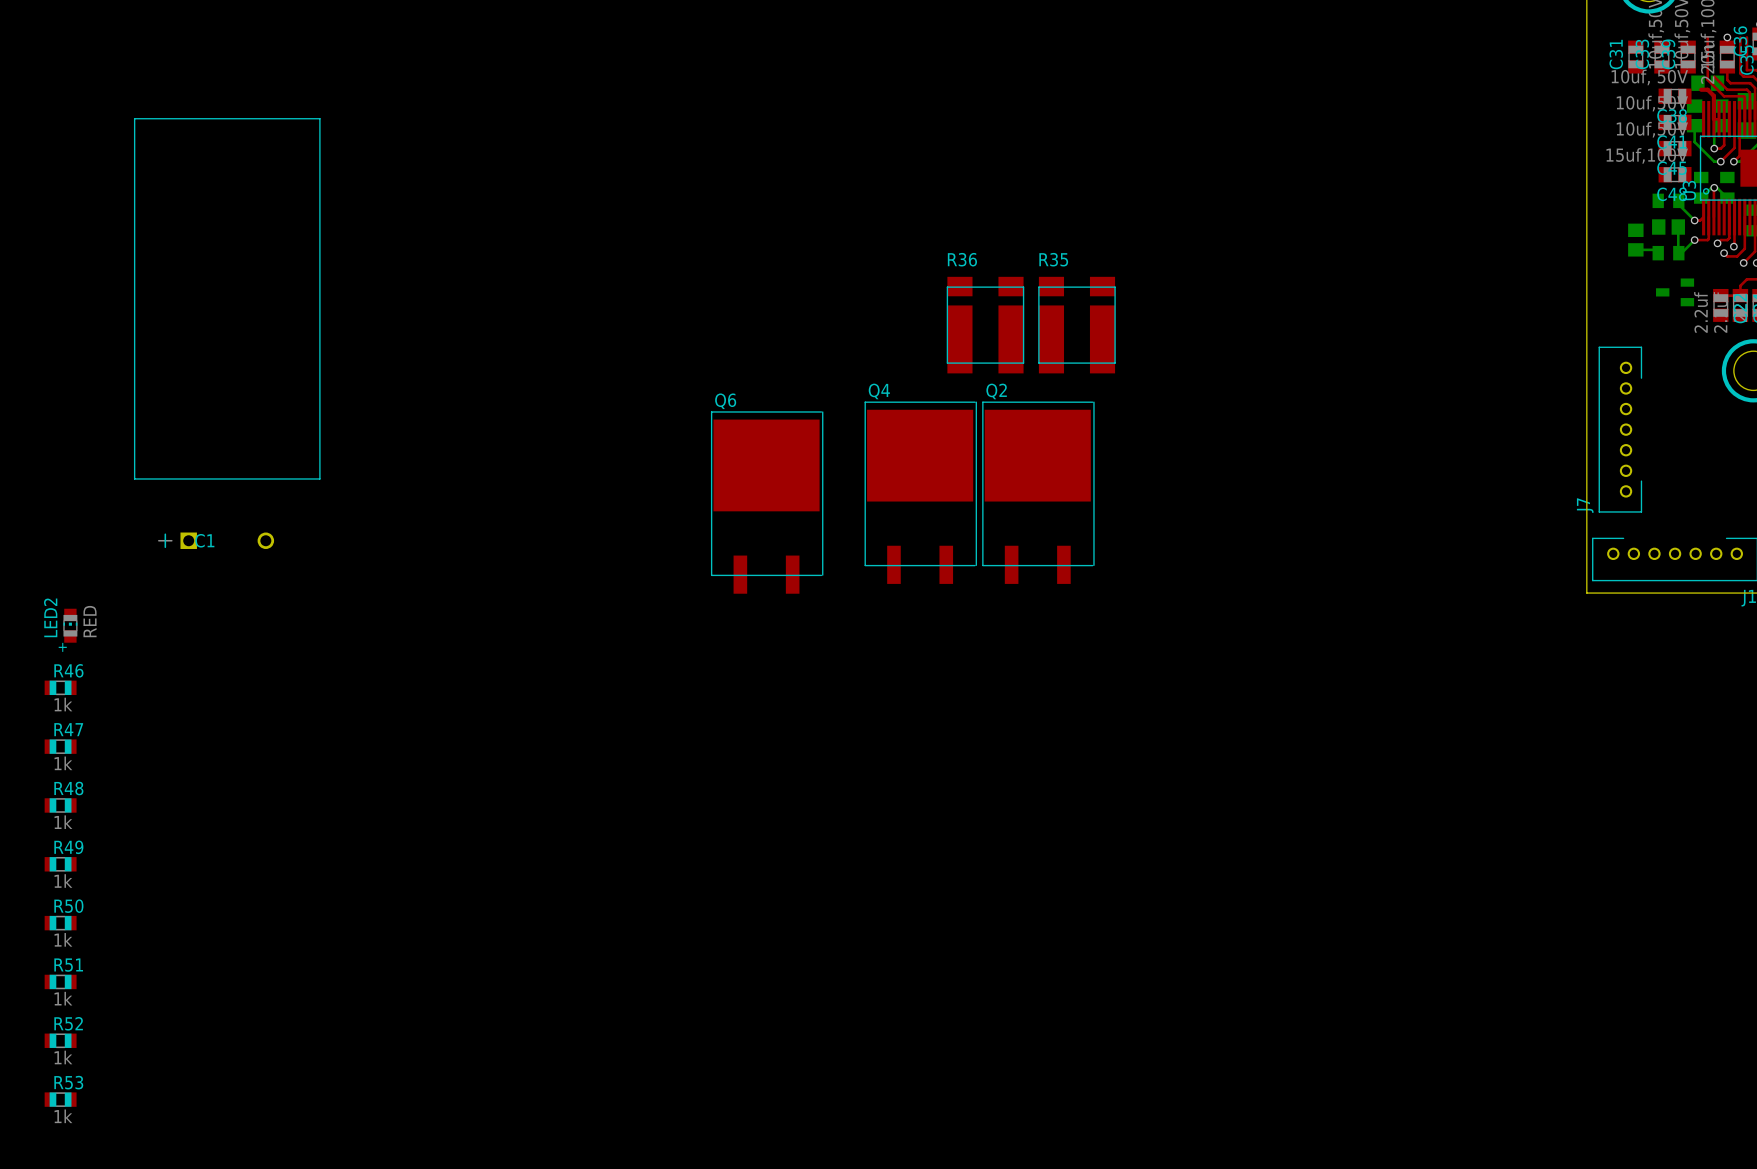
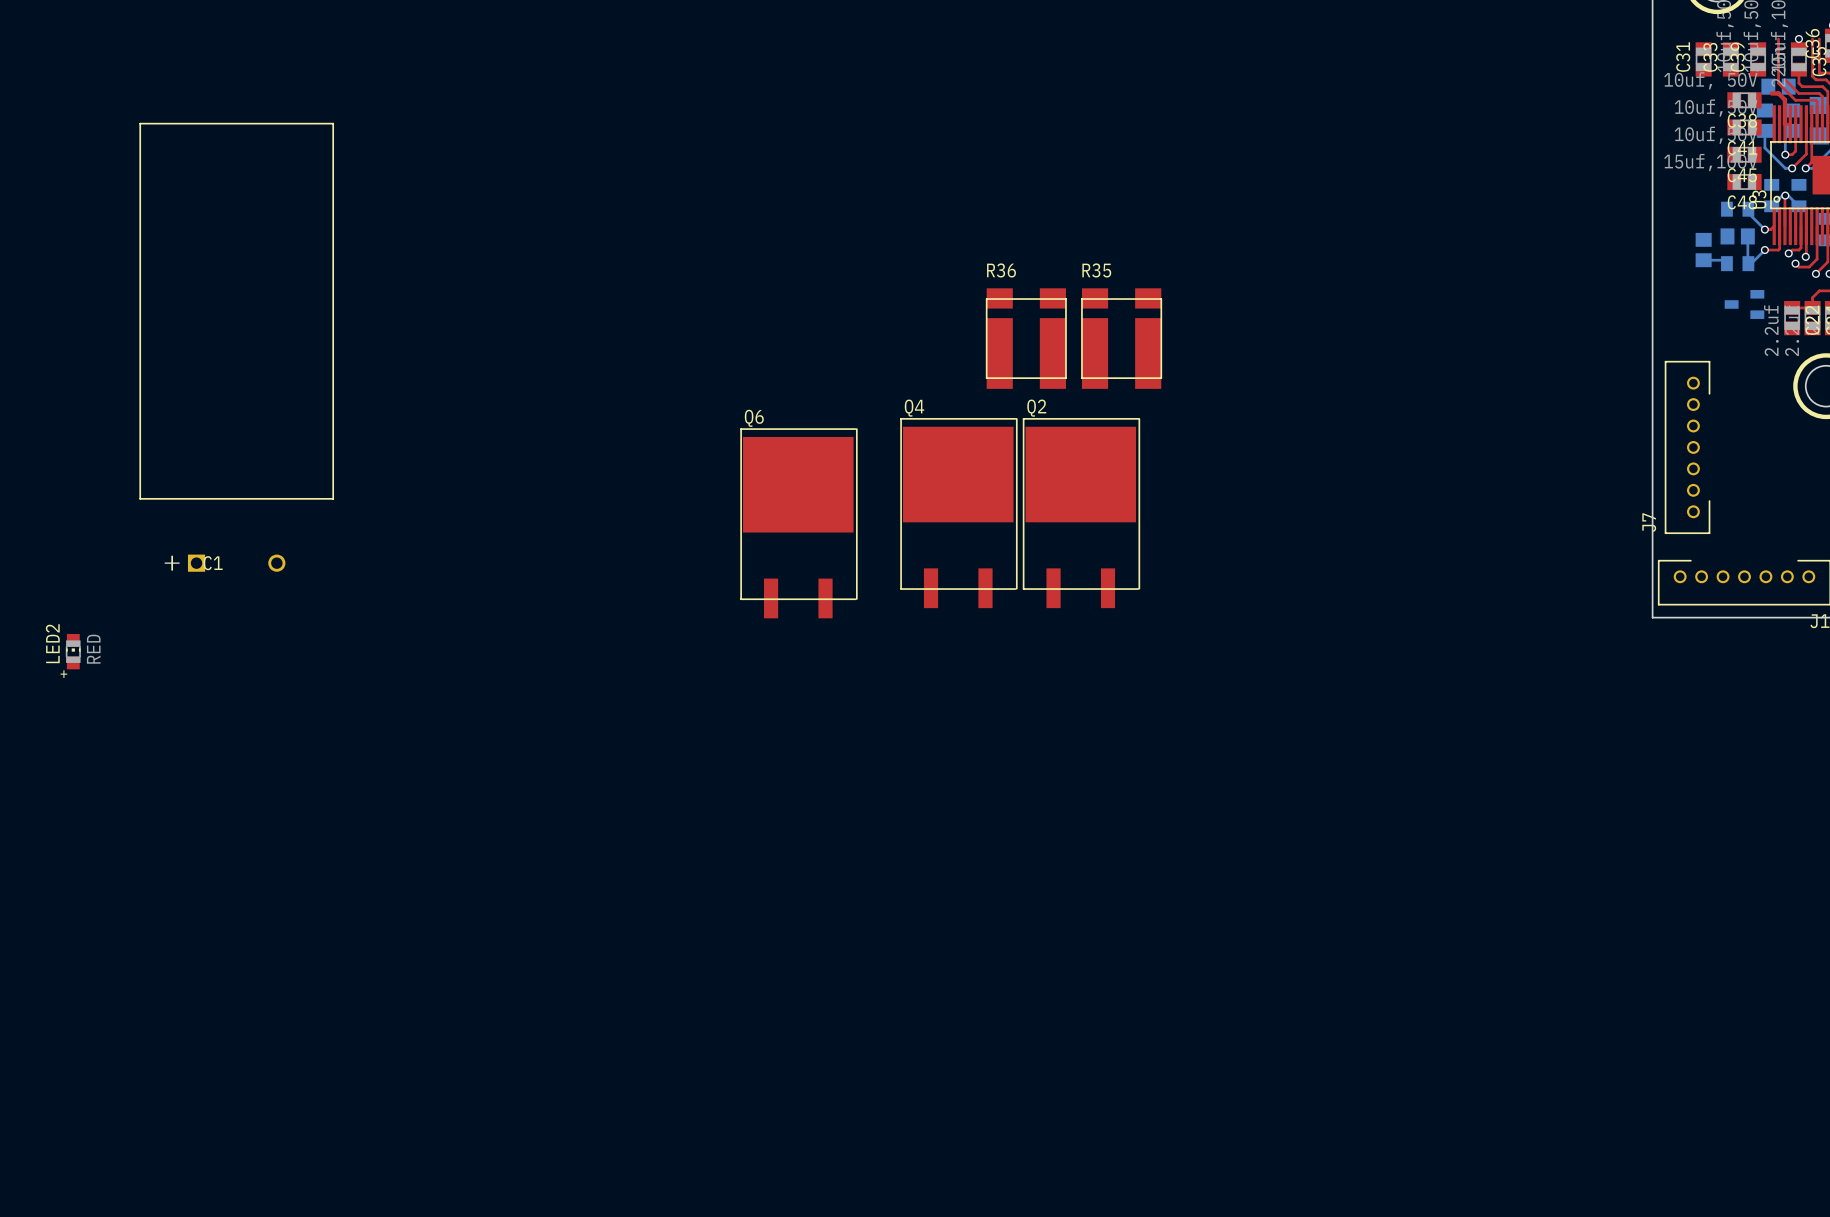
R46: 1k (60, 687) -> none
R47: 1k (60, 746) -> none
R48: 1k (60, 805) -> none
R49: 1k (60, 864) -> none
R50: 1k (60, 923) -> none
R51: 1k (60, 981) -> none
R52: 1k (60, 1040) -> none
R53: 1k (60, 1099) -> none

